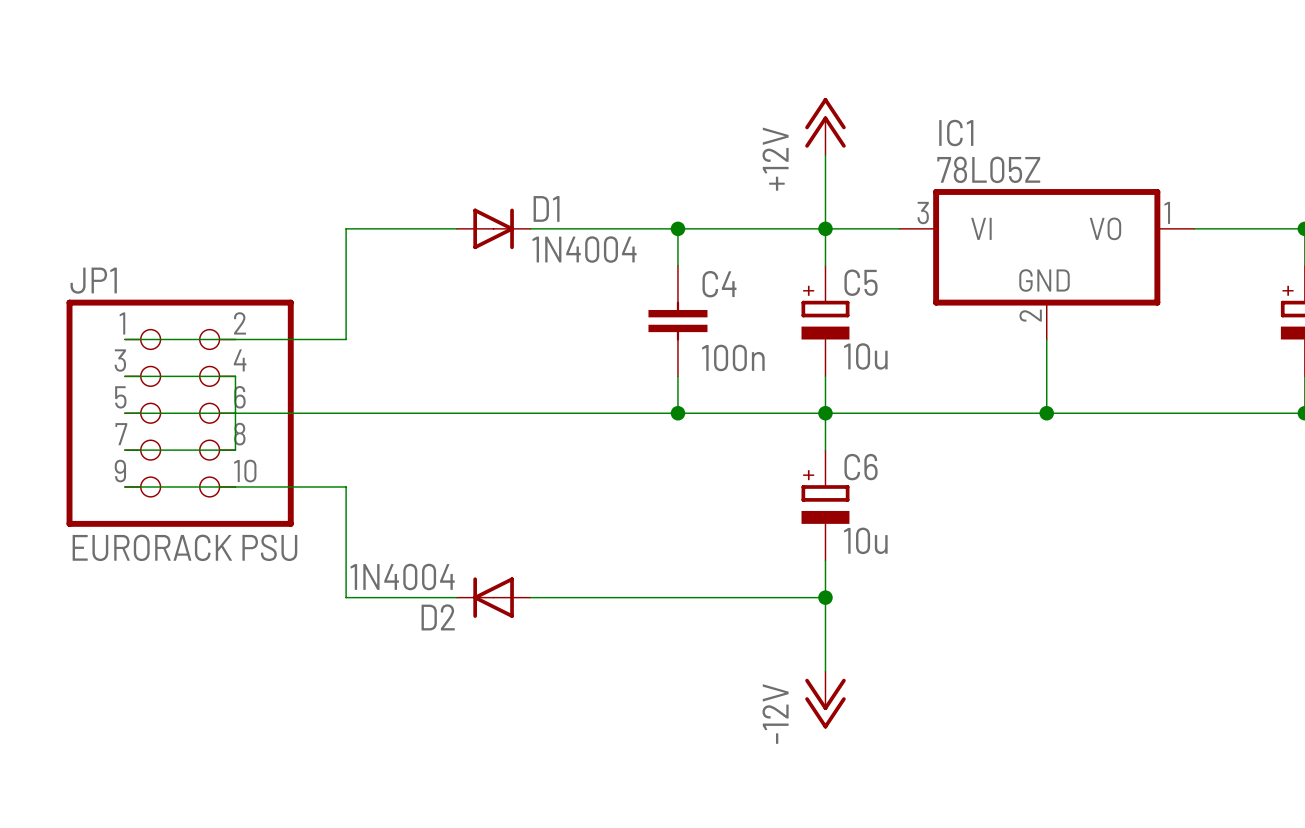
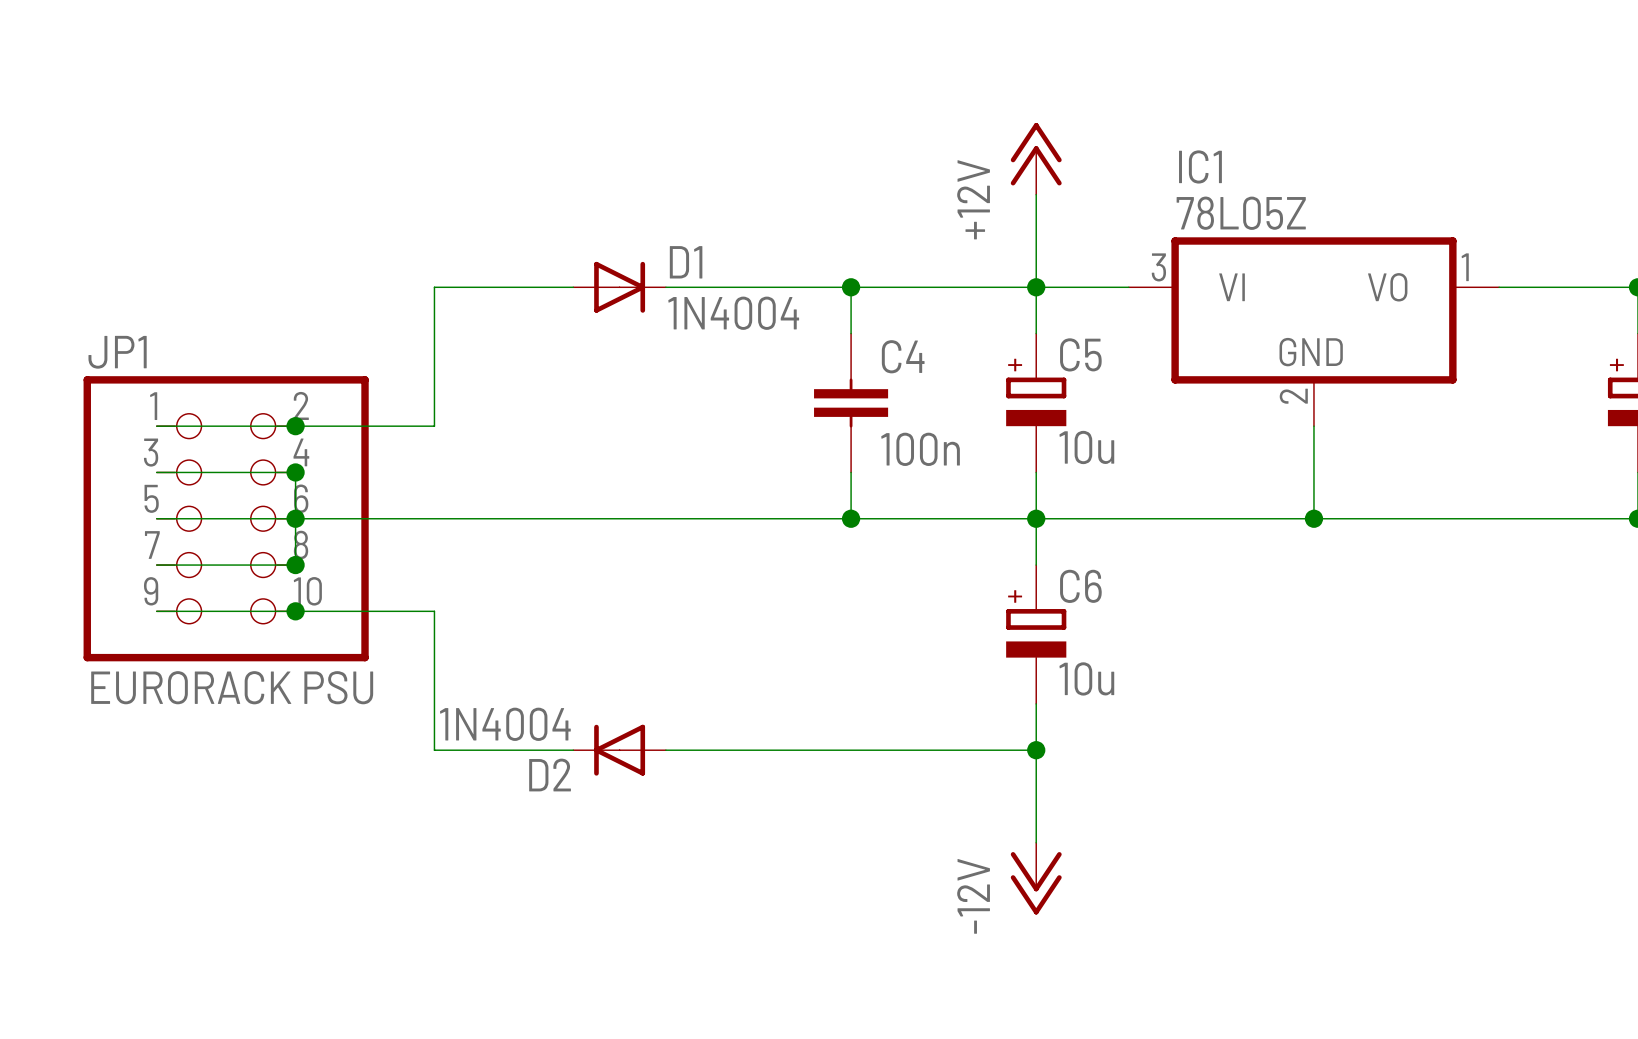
junction: none -> (295, 426)
junction: none -> (295, 472)
junction: none -> (295, 518)
junction: none -> (295, 565)
junction: none -> (295, 611)

